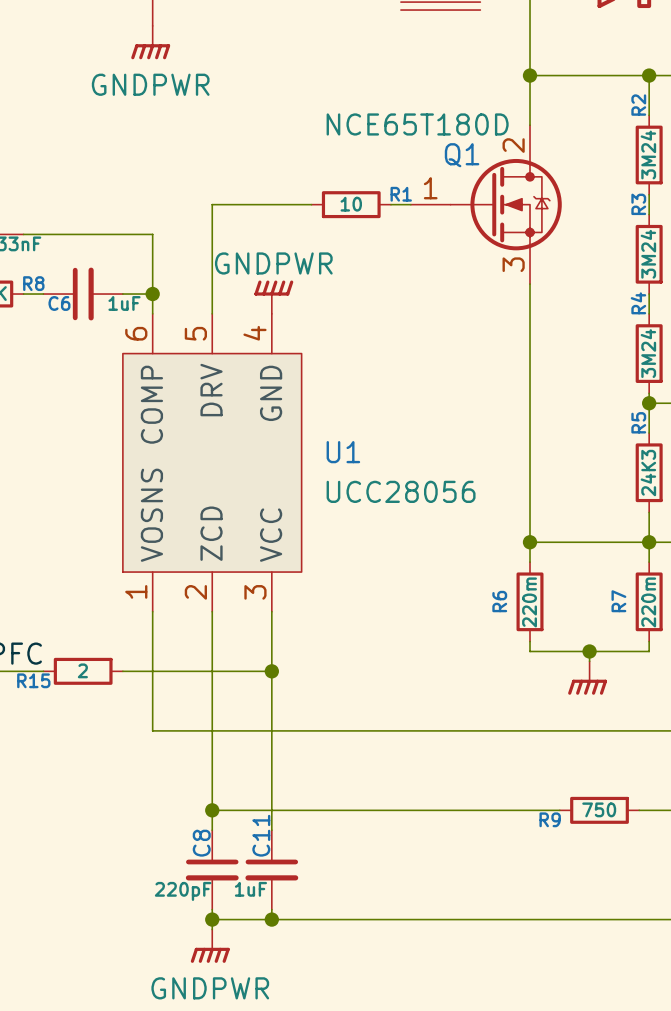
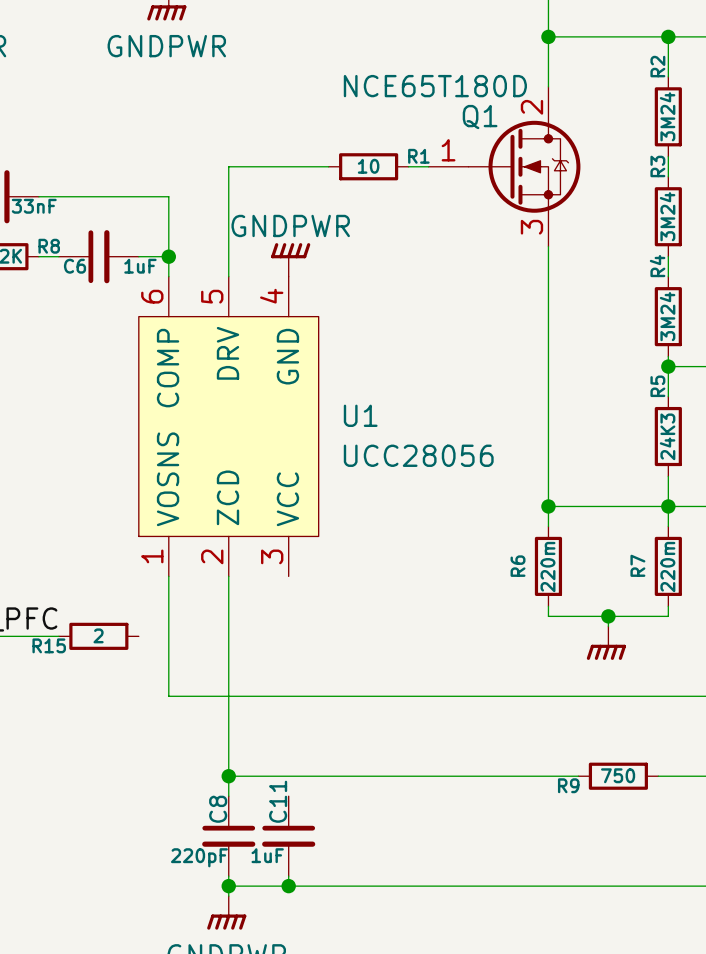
wire: (271, 611) (271, 830) -> none
wire: (122, 671) (271, 671) -> none
junction: (271, 671) -> none

